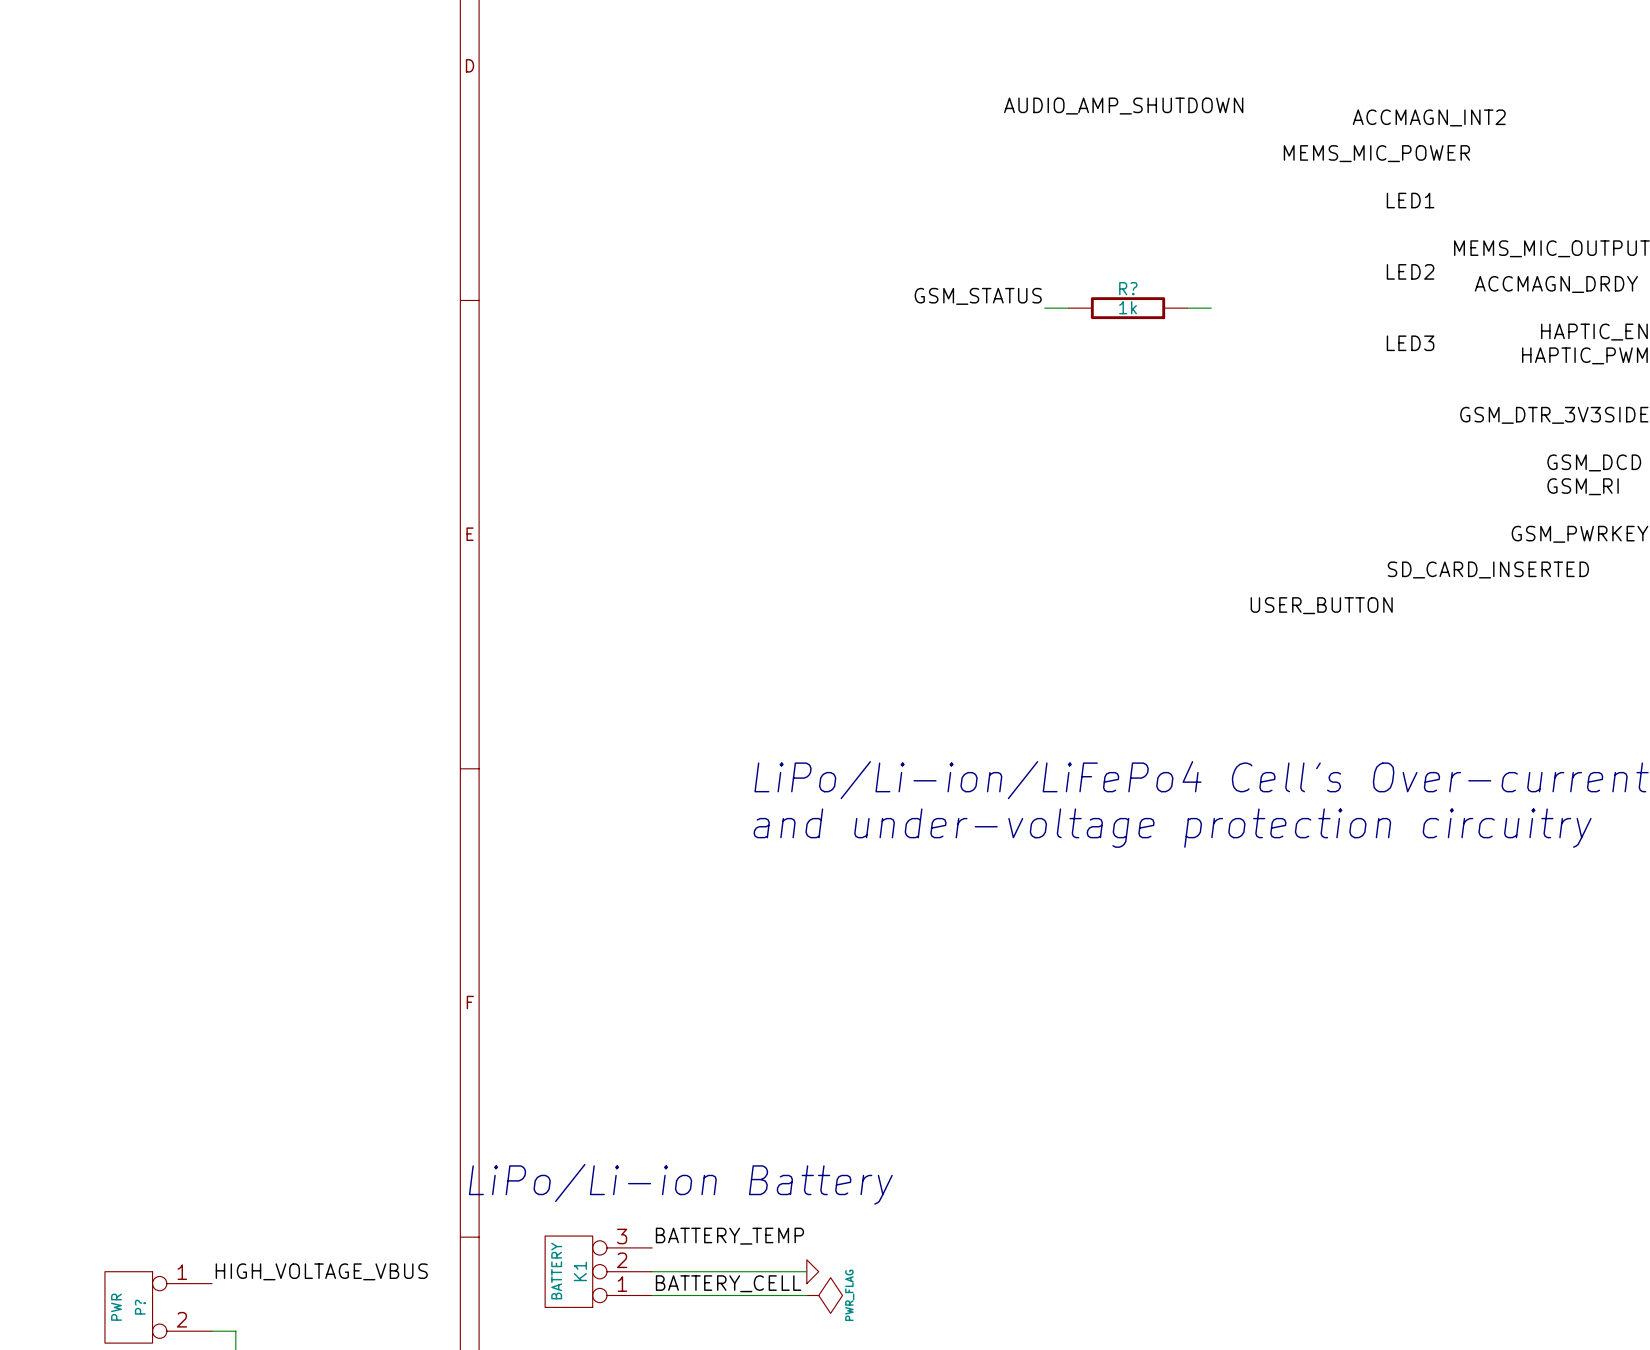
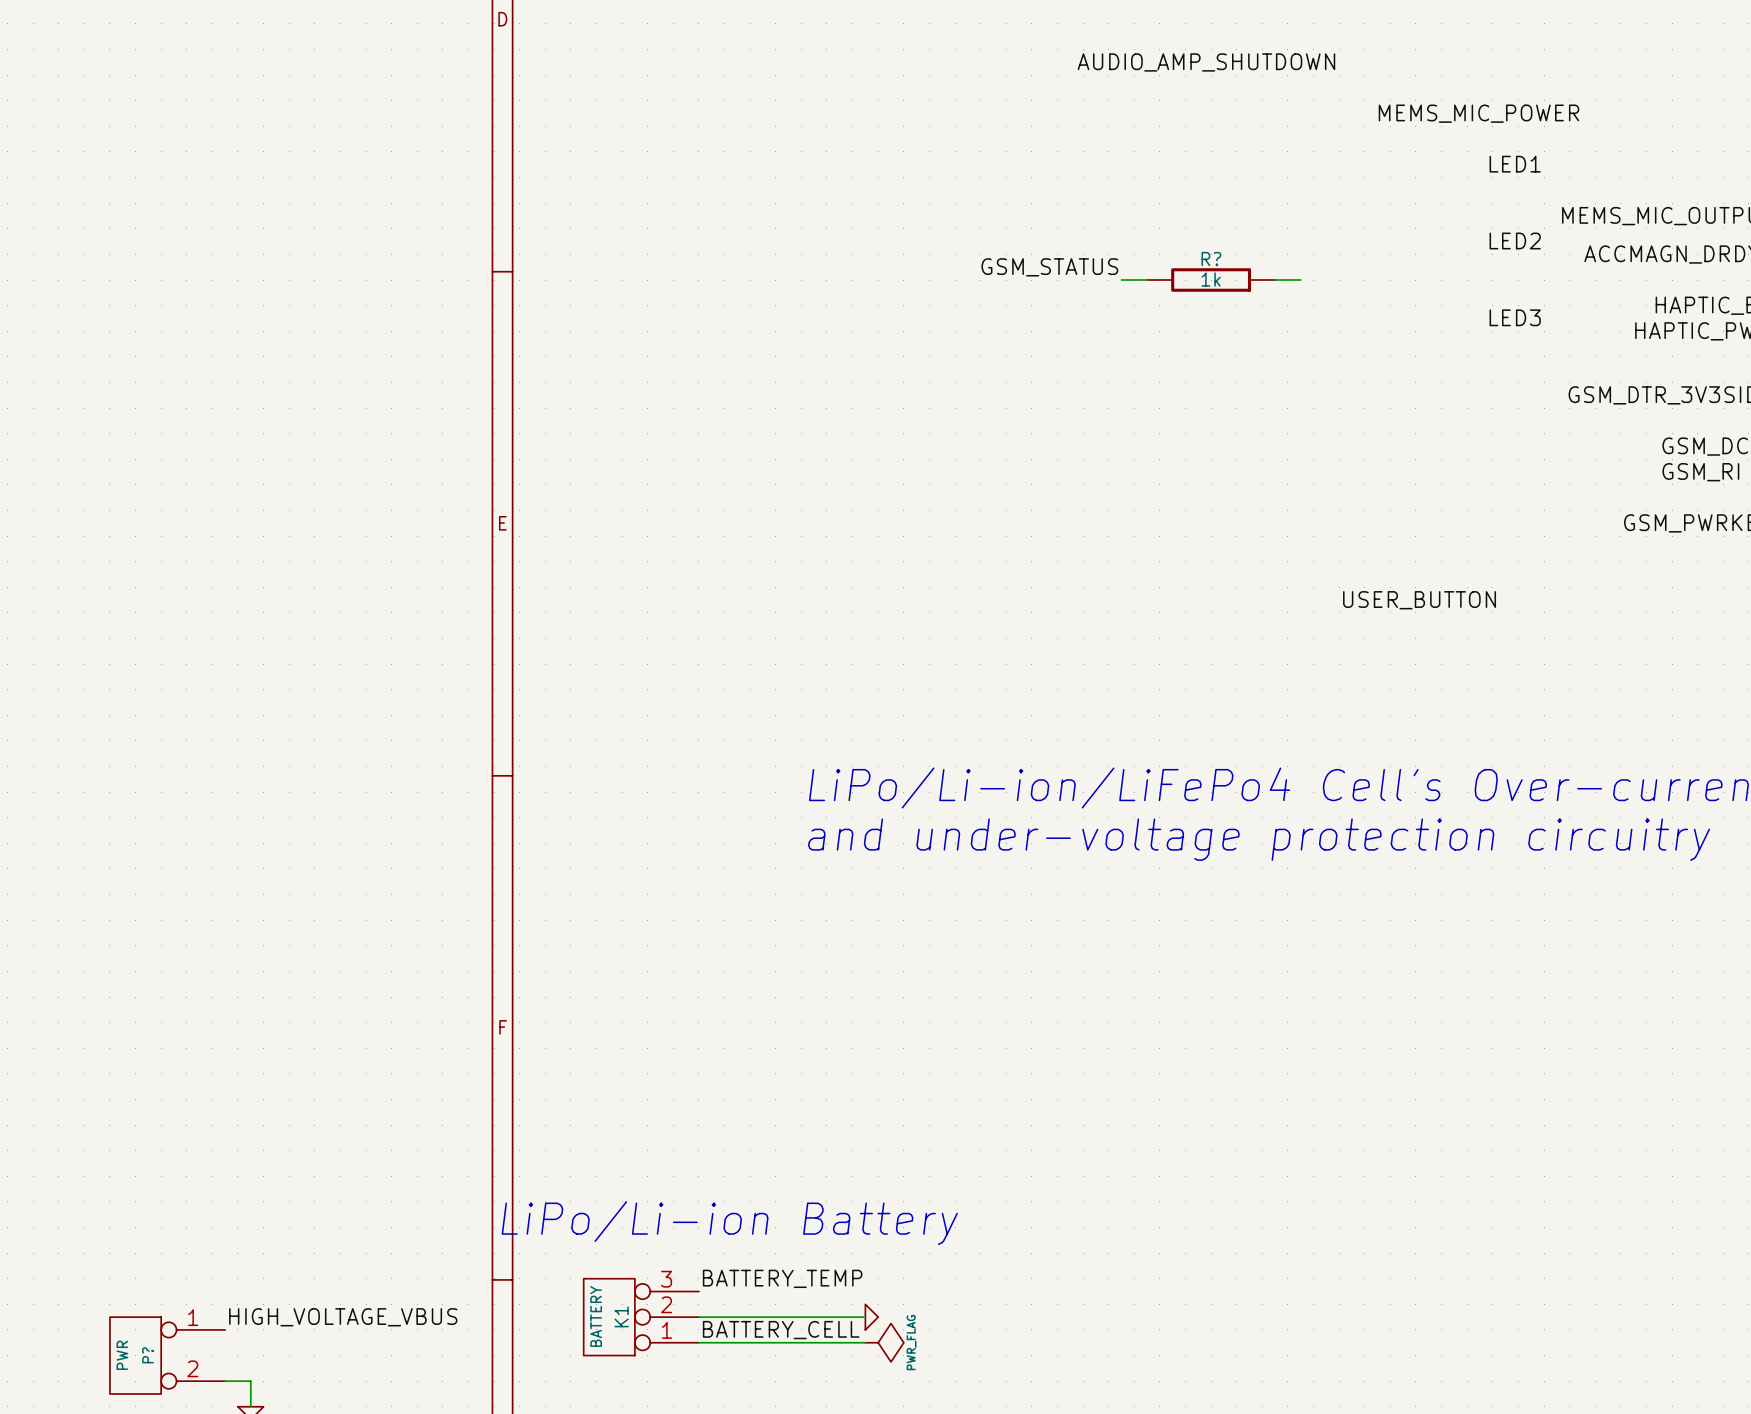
label: ACCMAGN_INT2 (1429, 117) -> none
label: SD_CARD_INSERTED (1488, 569) -> none

